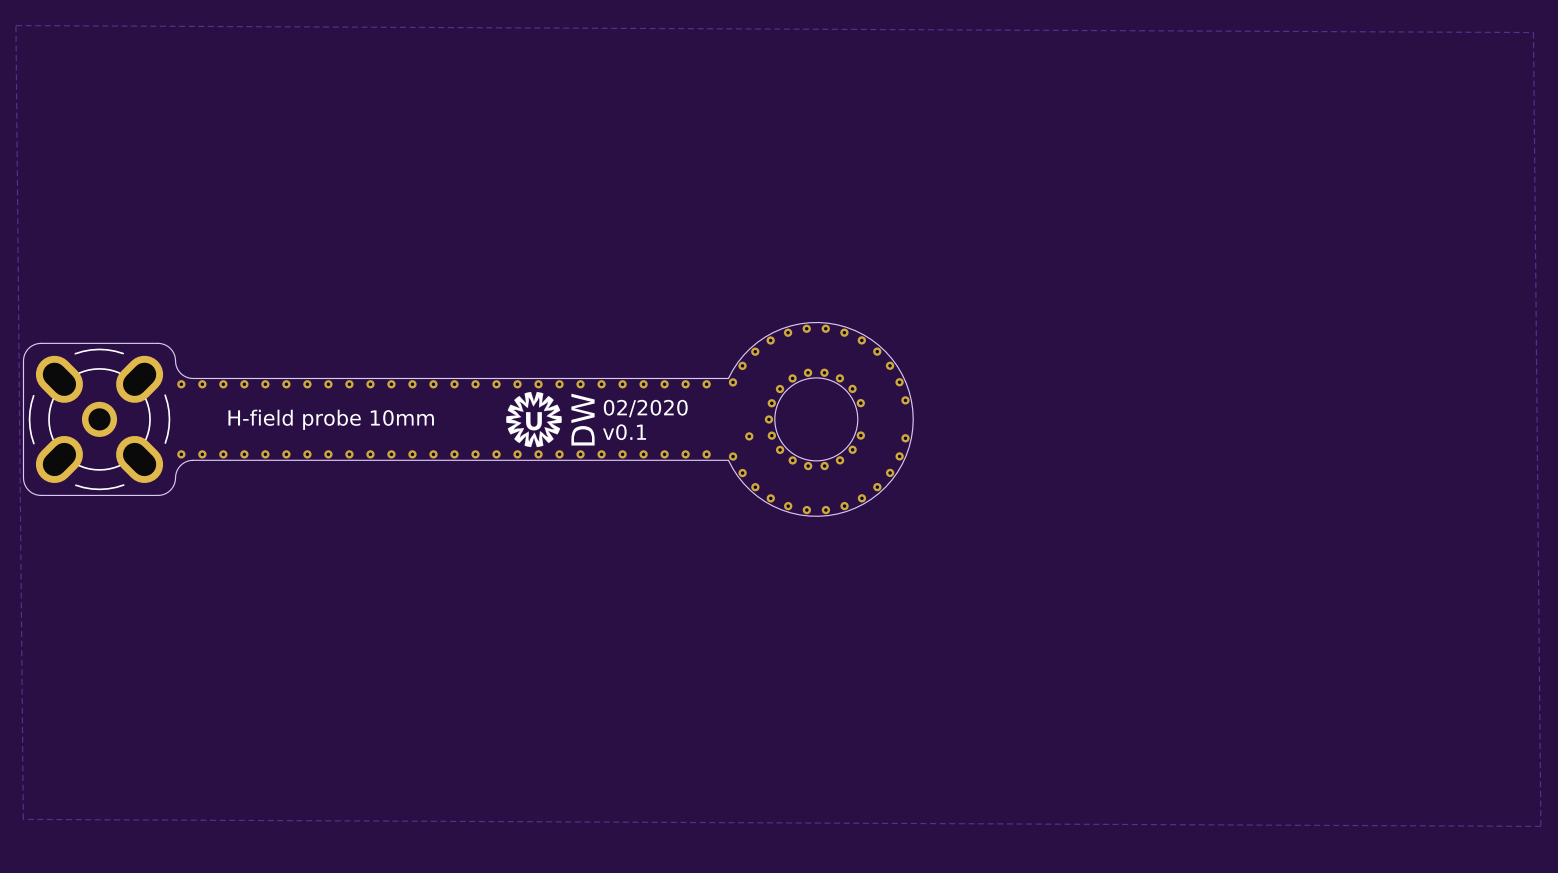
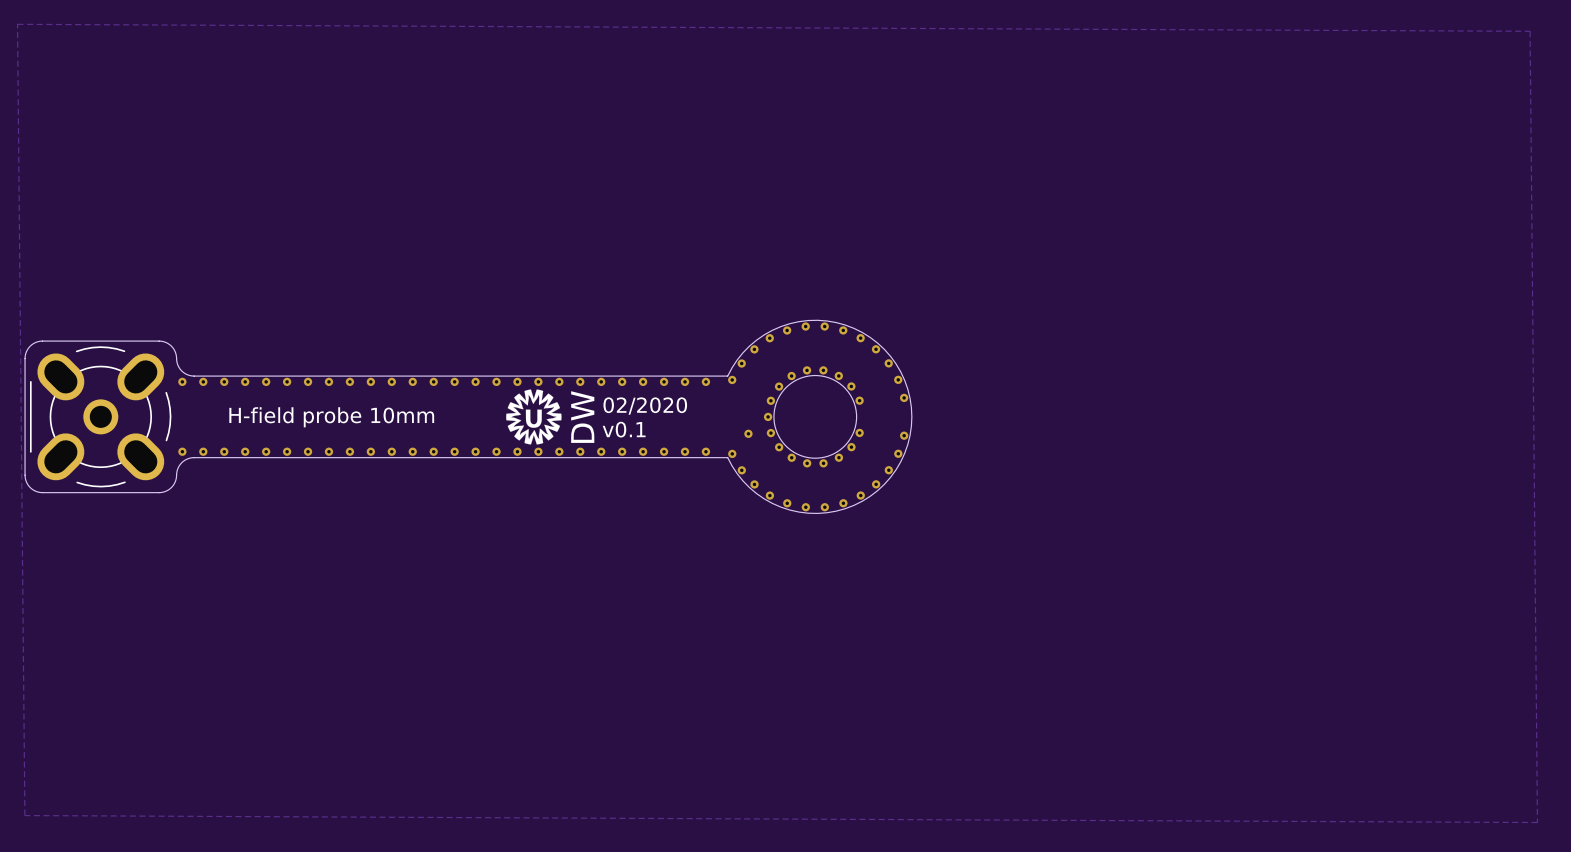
part footprint: [28, 348, 171, 491] -> [30, 346, 172, 488]

